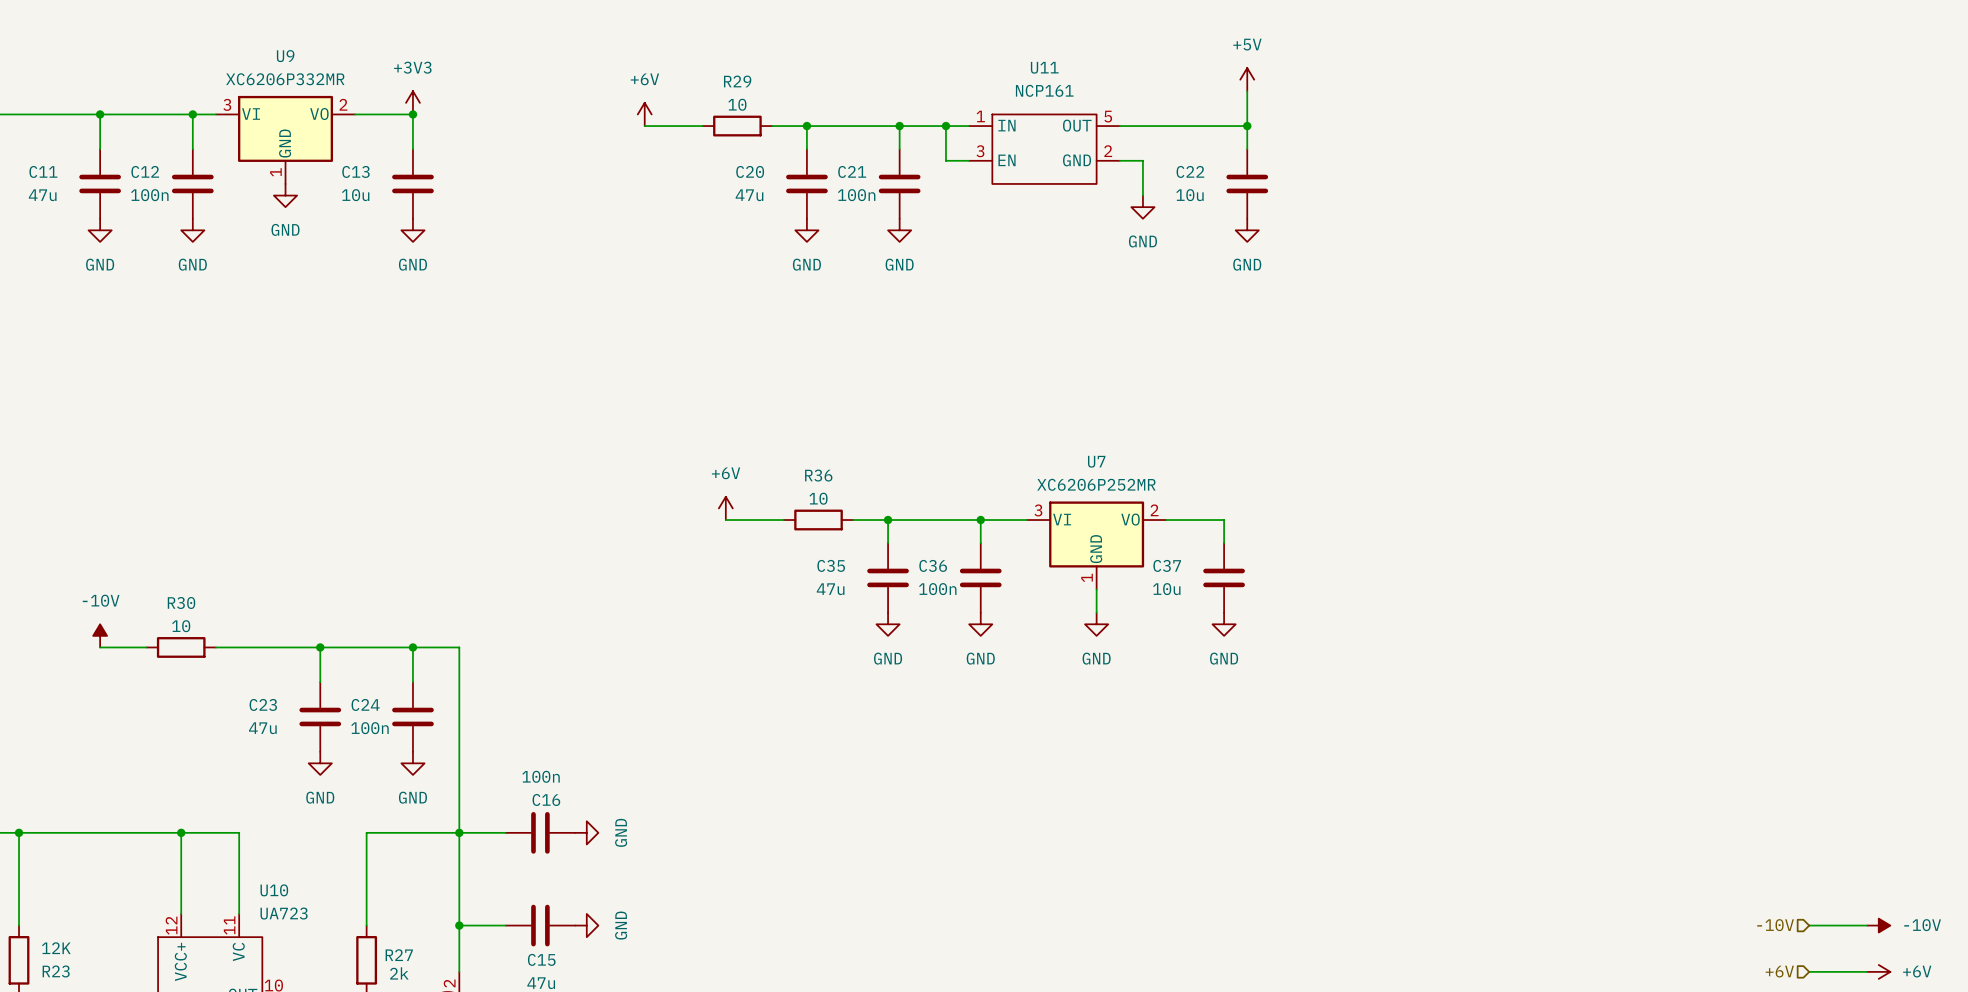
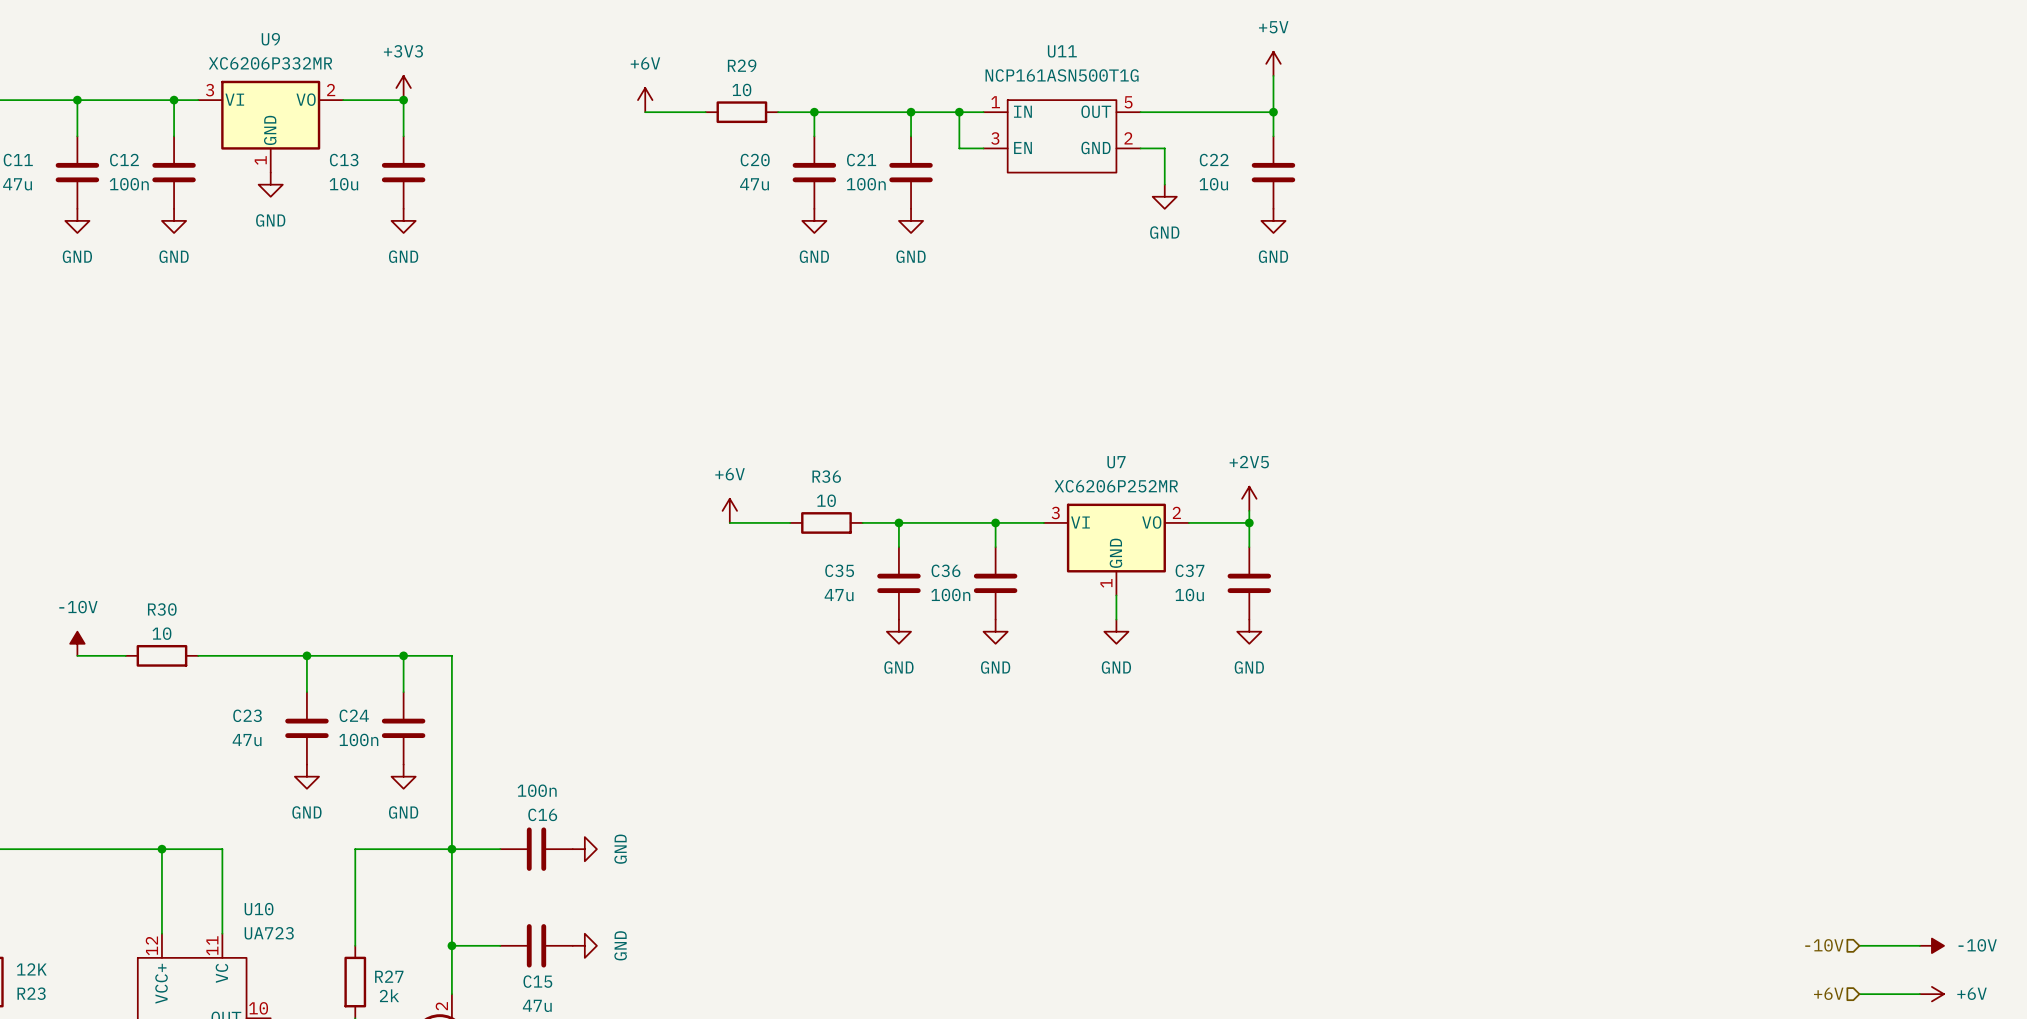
U11 value: NCP161 (1044, 90) -> NCP161ASN500T1G (1062, 75)
power symbol: none -> +2V5 (1249, 498)
wire: none -> (1249, 510) (1249, 522)
junction: none -> (1249, 522)

